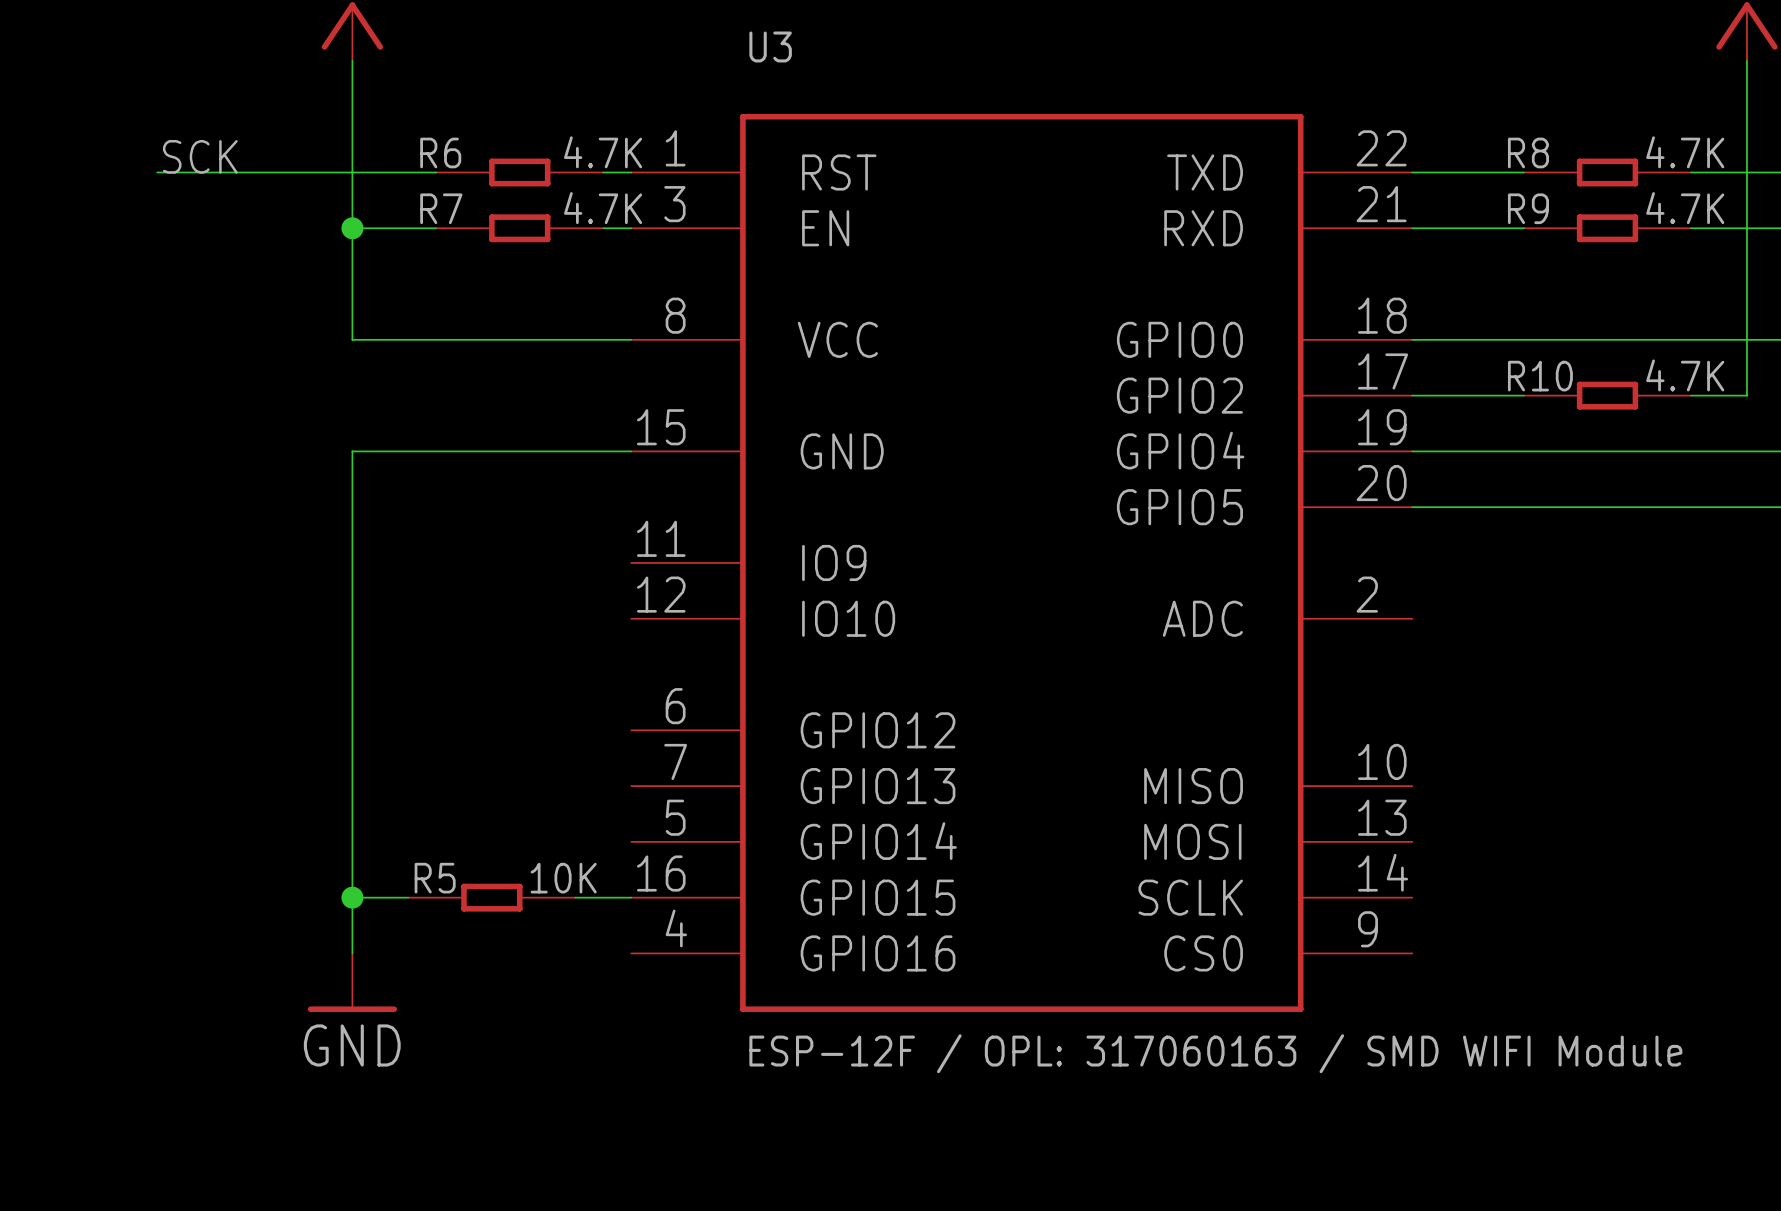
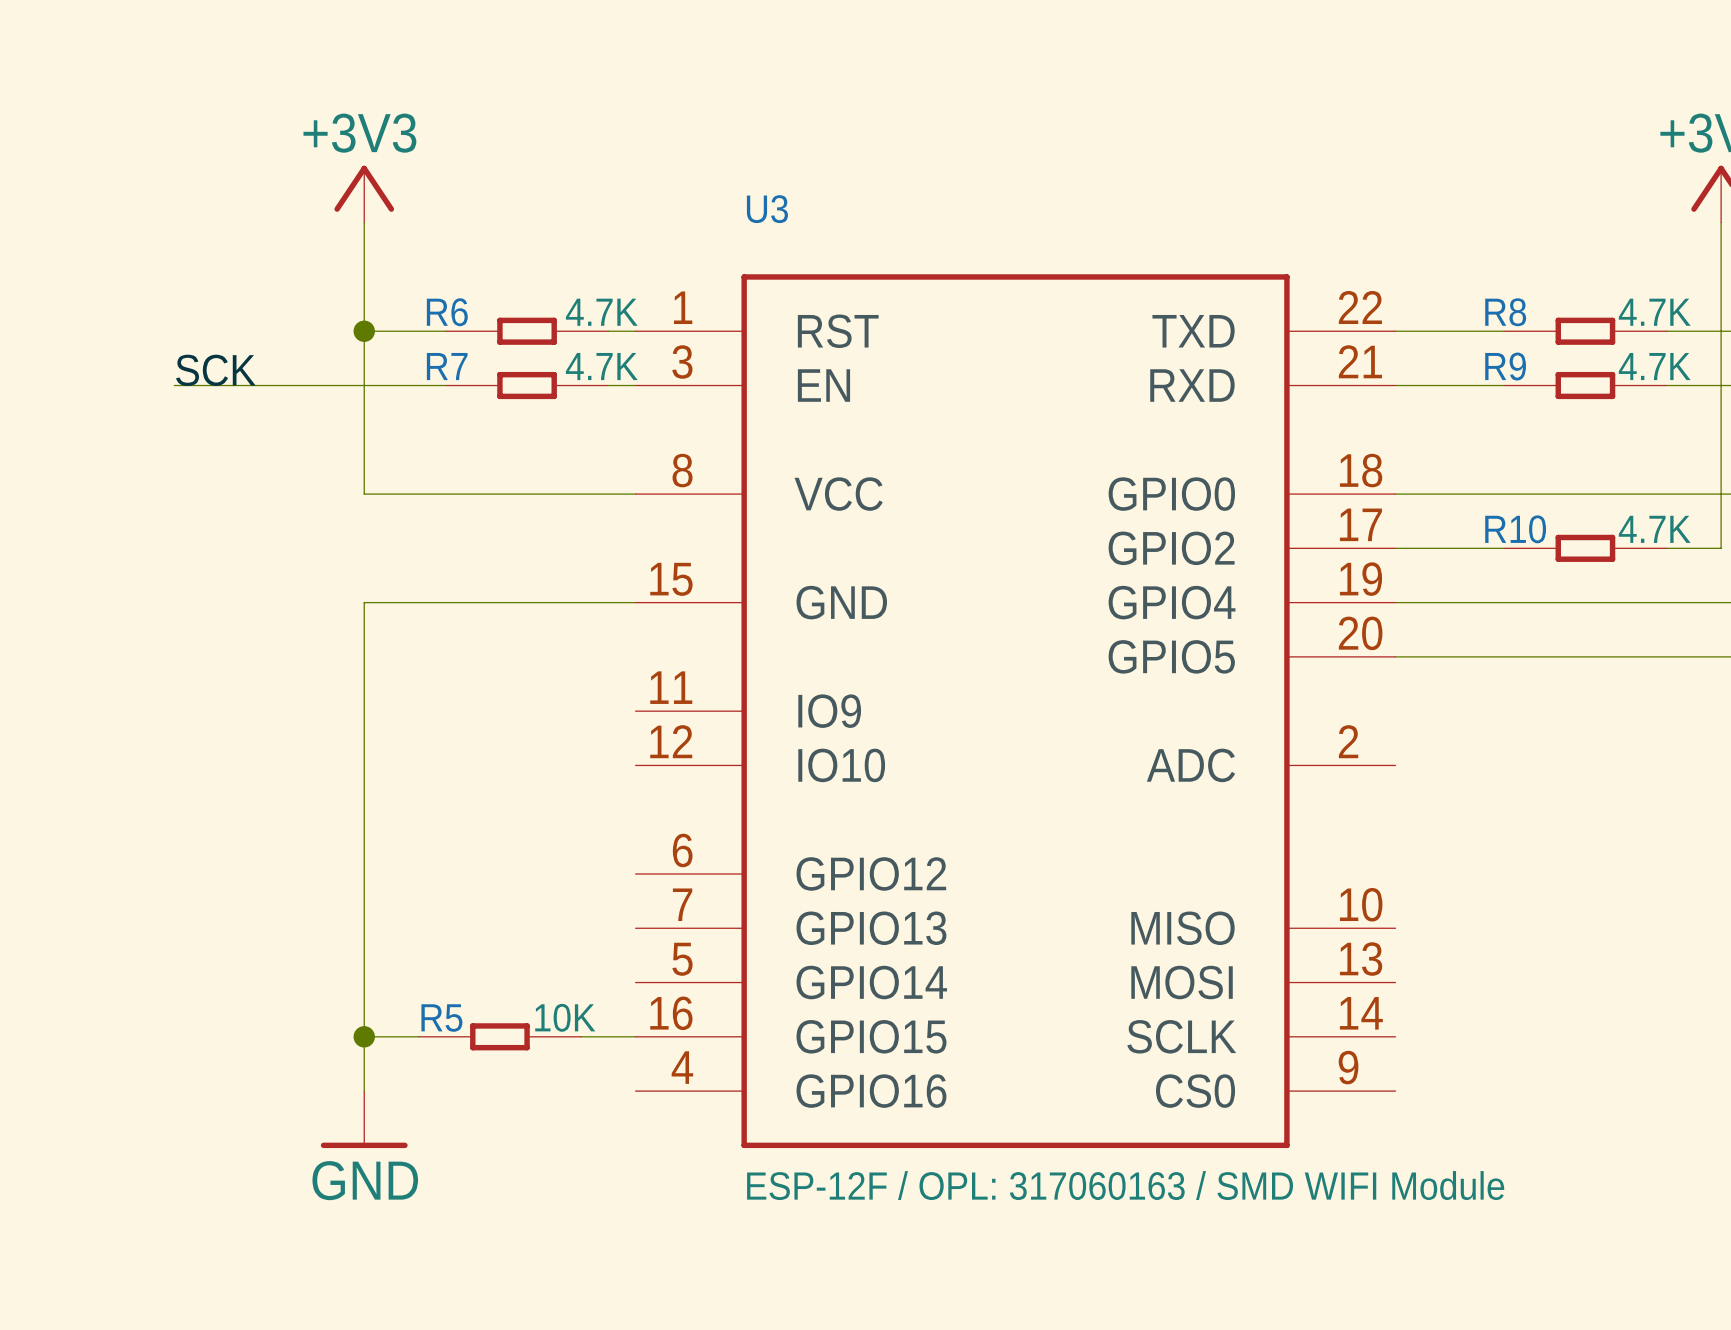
label position: SCK (200, 156) -> SCK (215, 370)
wire: (157, 172) (352, 172) -> (174, 385) (364, 385)
junction position: (352, 228) -> (364, 331)

